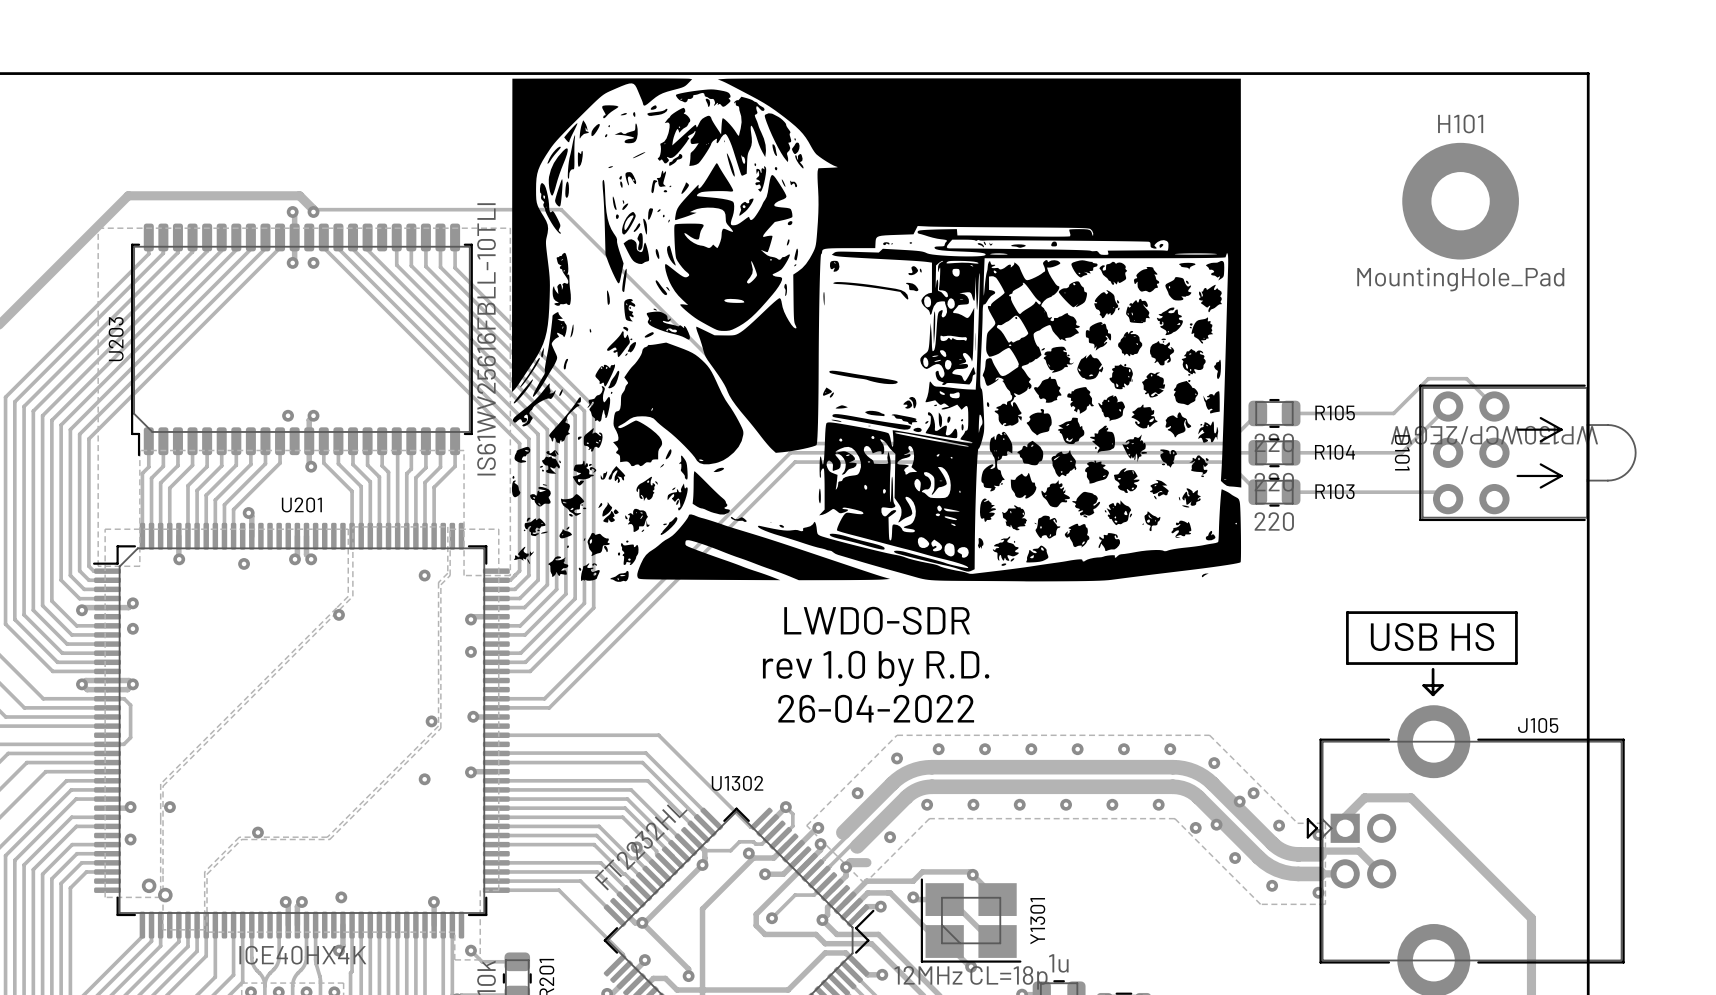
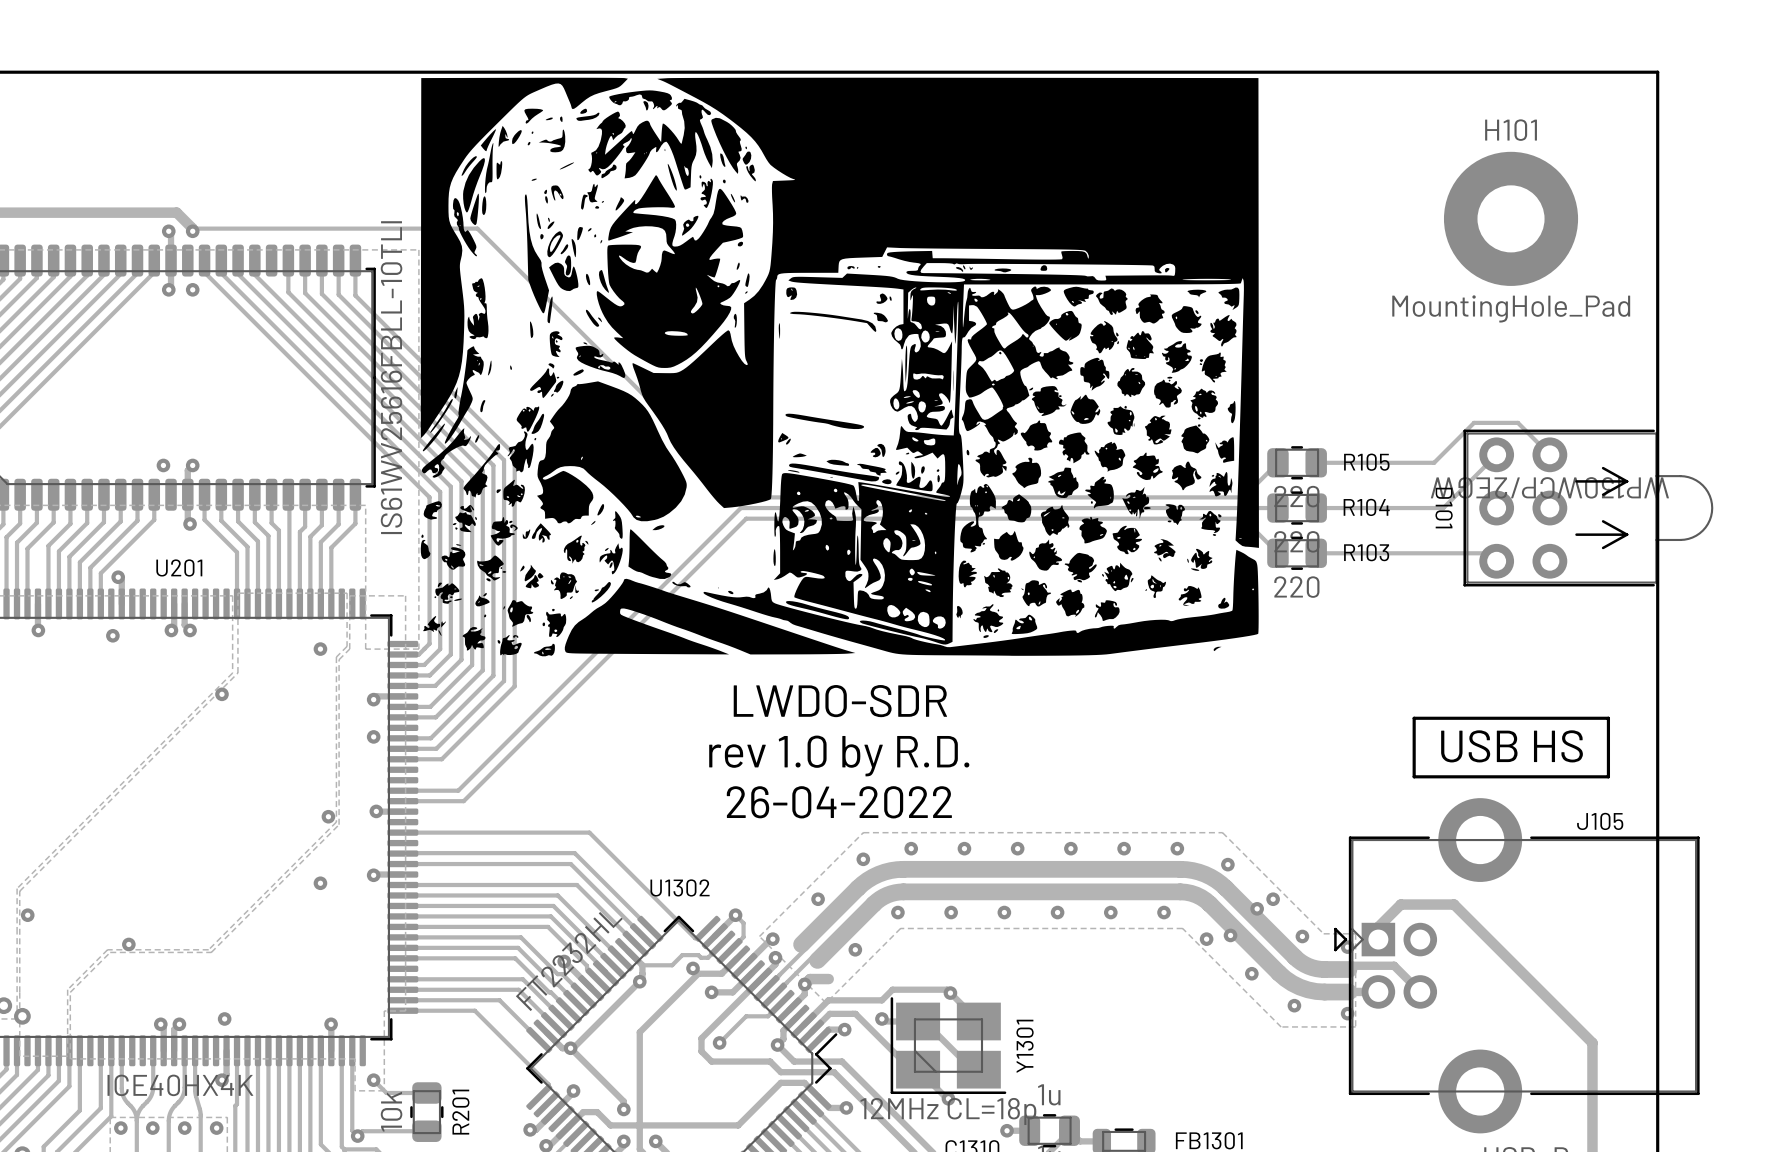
line: (1347, 612) (1516, 612) (1516, 663) (1347, 663) (1347, 612) -> (1414, 718) (1608, 718) (1608, 776) (1414, 776) (1414, 718)
text position: USB HS (1432, 637) -> USB HS (1512, 746)
line: (1433, 669) (1433, 694) -> none
line: (1433, 694) (1442, 685) (1423, 685) (1433, 694) -> none

